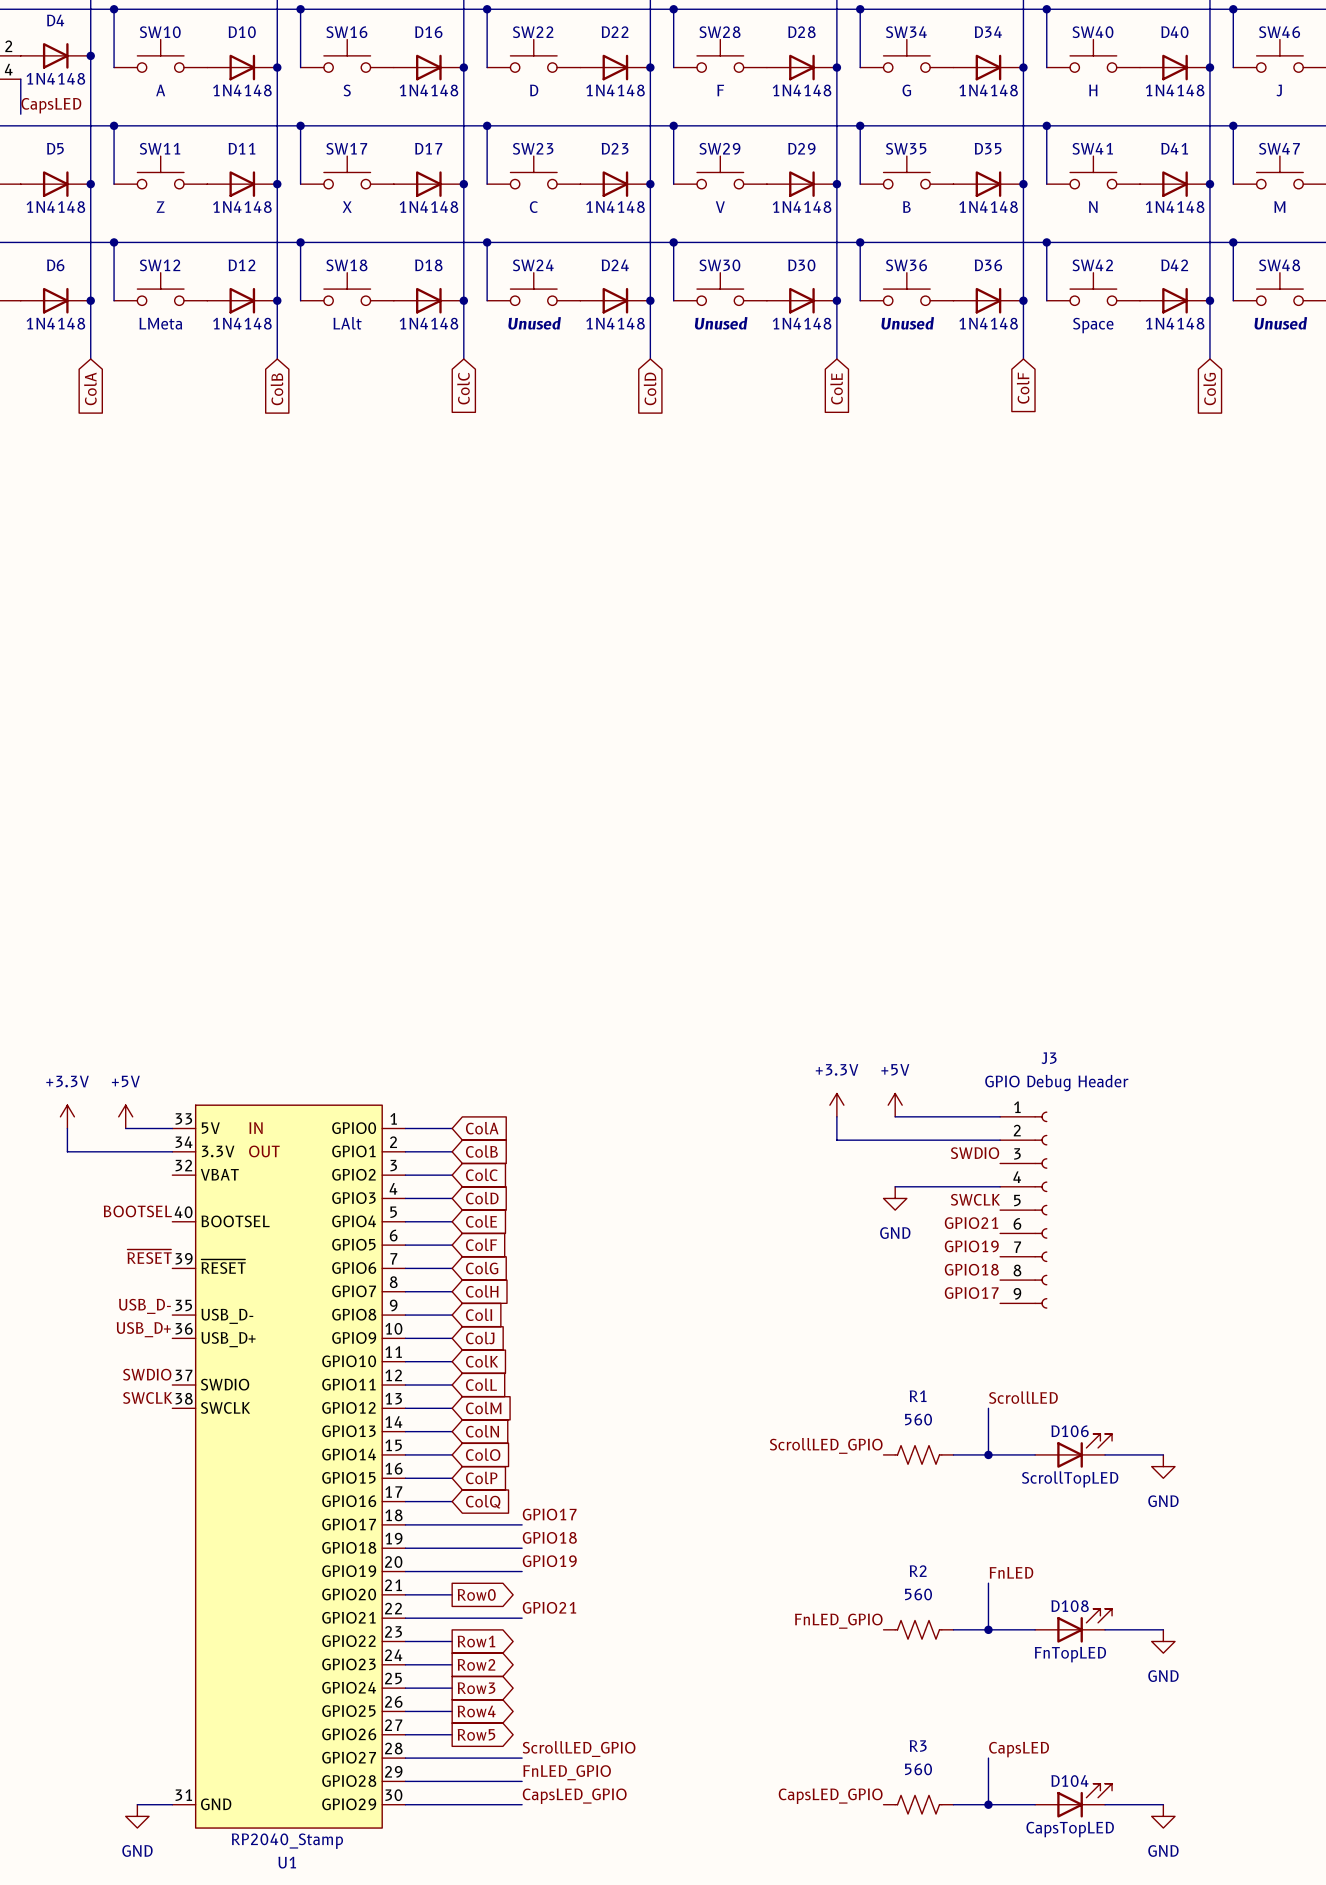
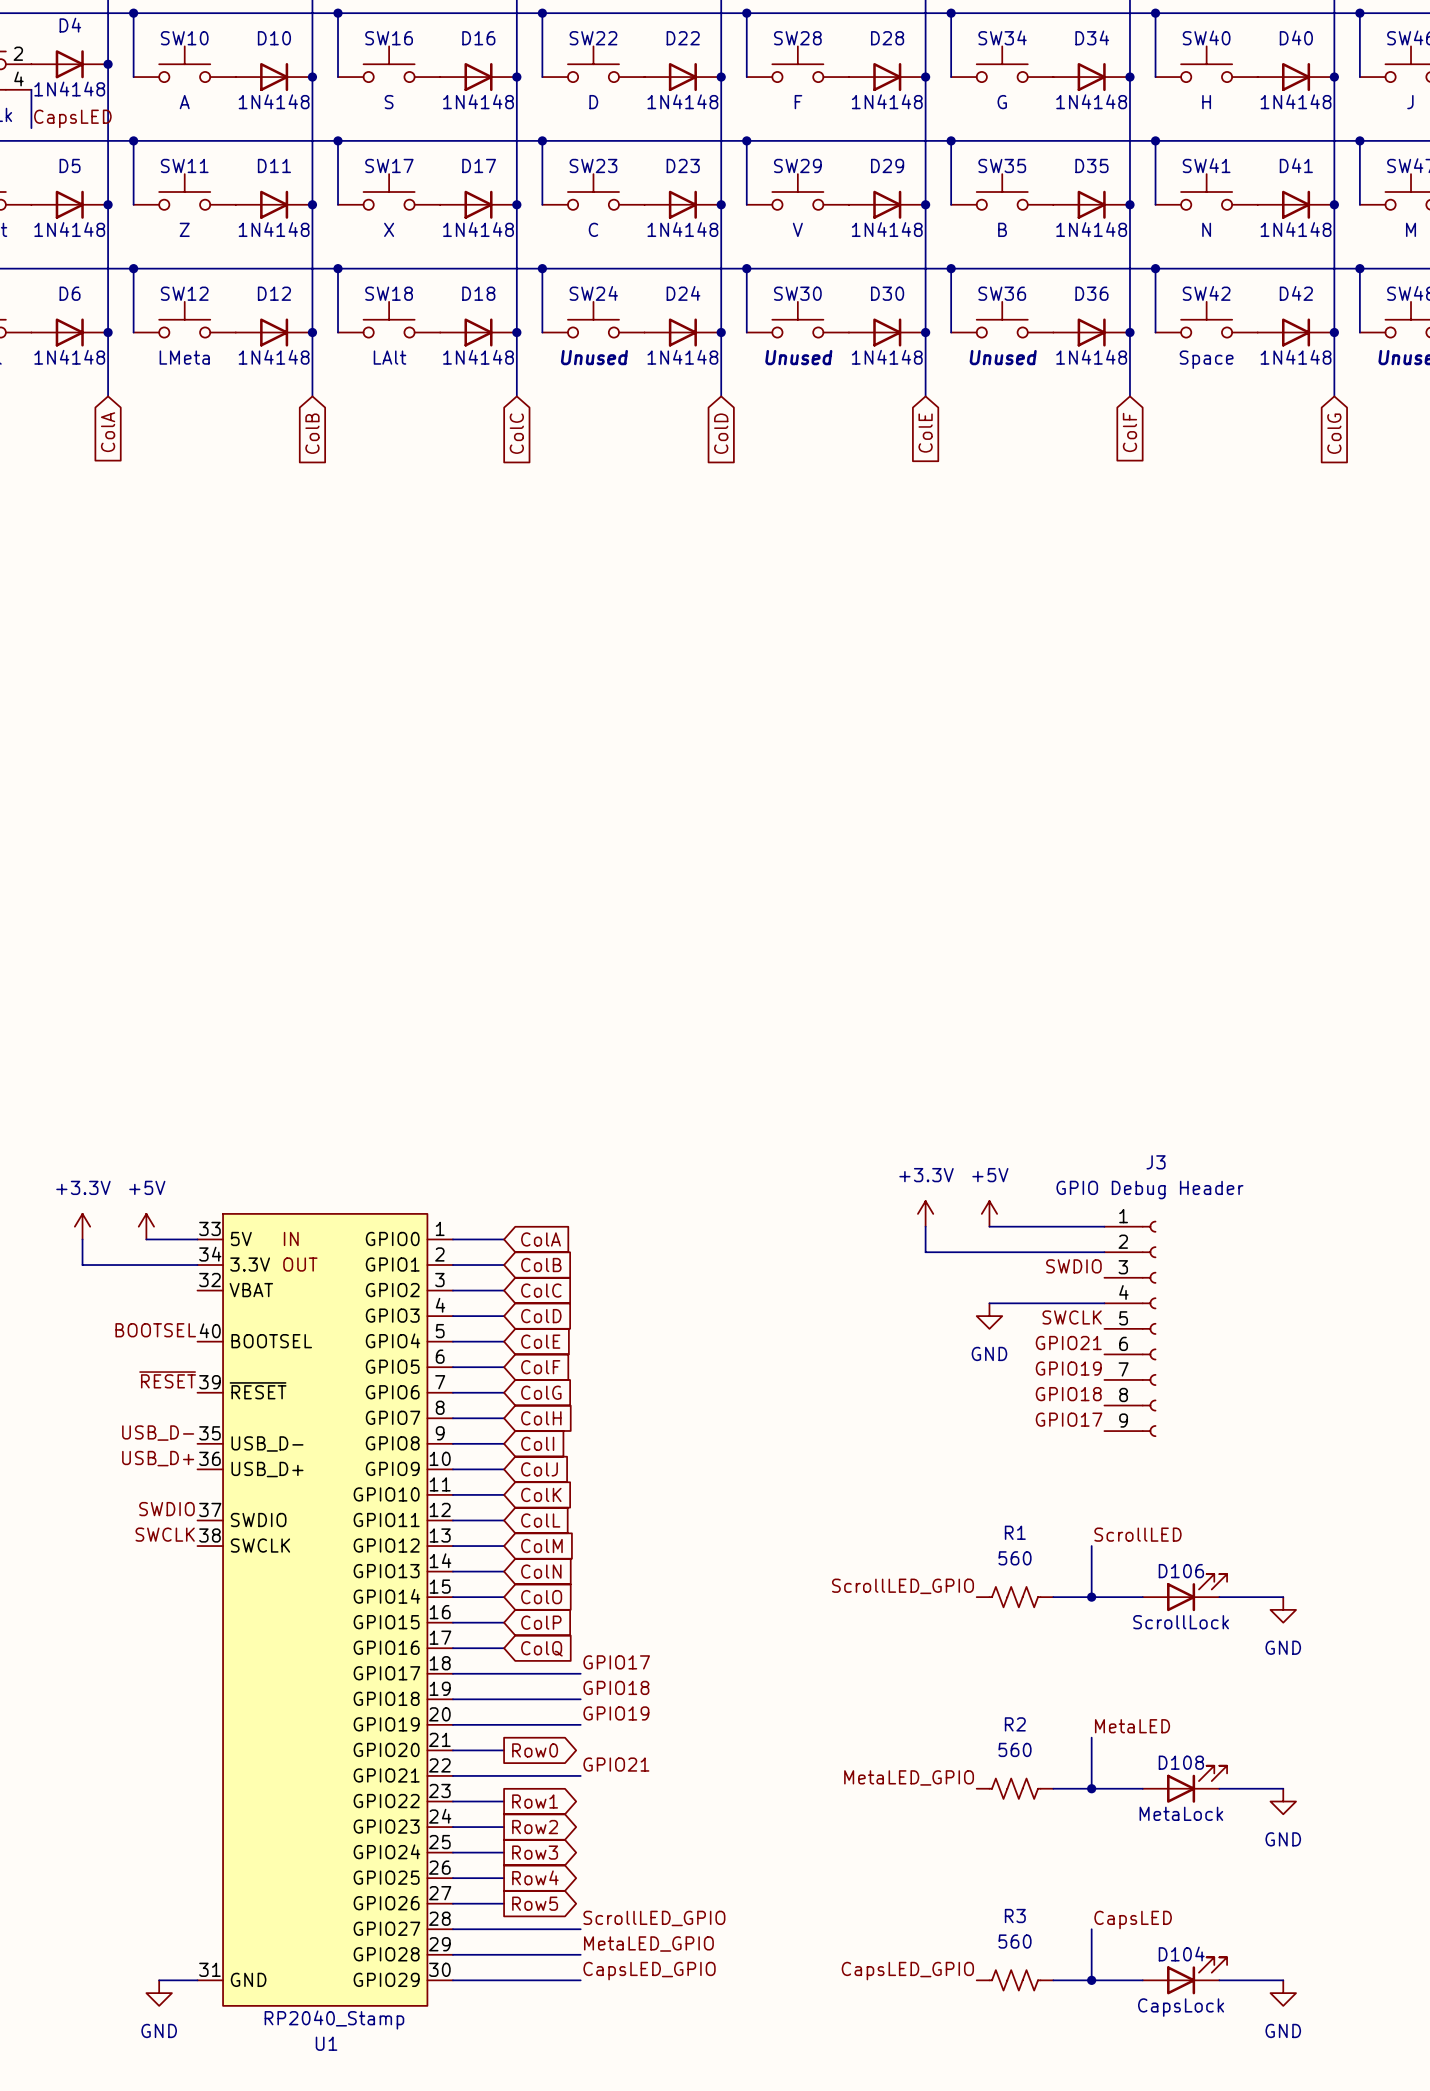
D106 value: ScrollTopLED (1070, 1479) -> ScrollLock (1181, 1622)
label: FnLED (1011, 1572) -> MetaLED (1132, 1726)
label: FnLED_GPIO (838, 1621) -> MetaLED_GPIO (909, 1777)
D108 value: FnTopLED (1070, 1654) -> MetaLock (1181, 1813)
label: FnLED_GPIO (567, 1772) -> MetaLED_GPIO (648, 1944)
D104 value: CapsTopLED (1070, 1829) -> CapsLock (1181, 2007)

